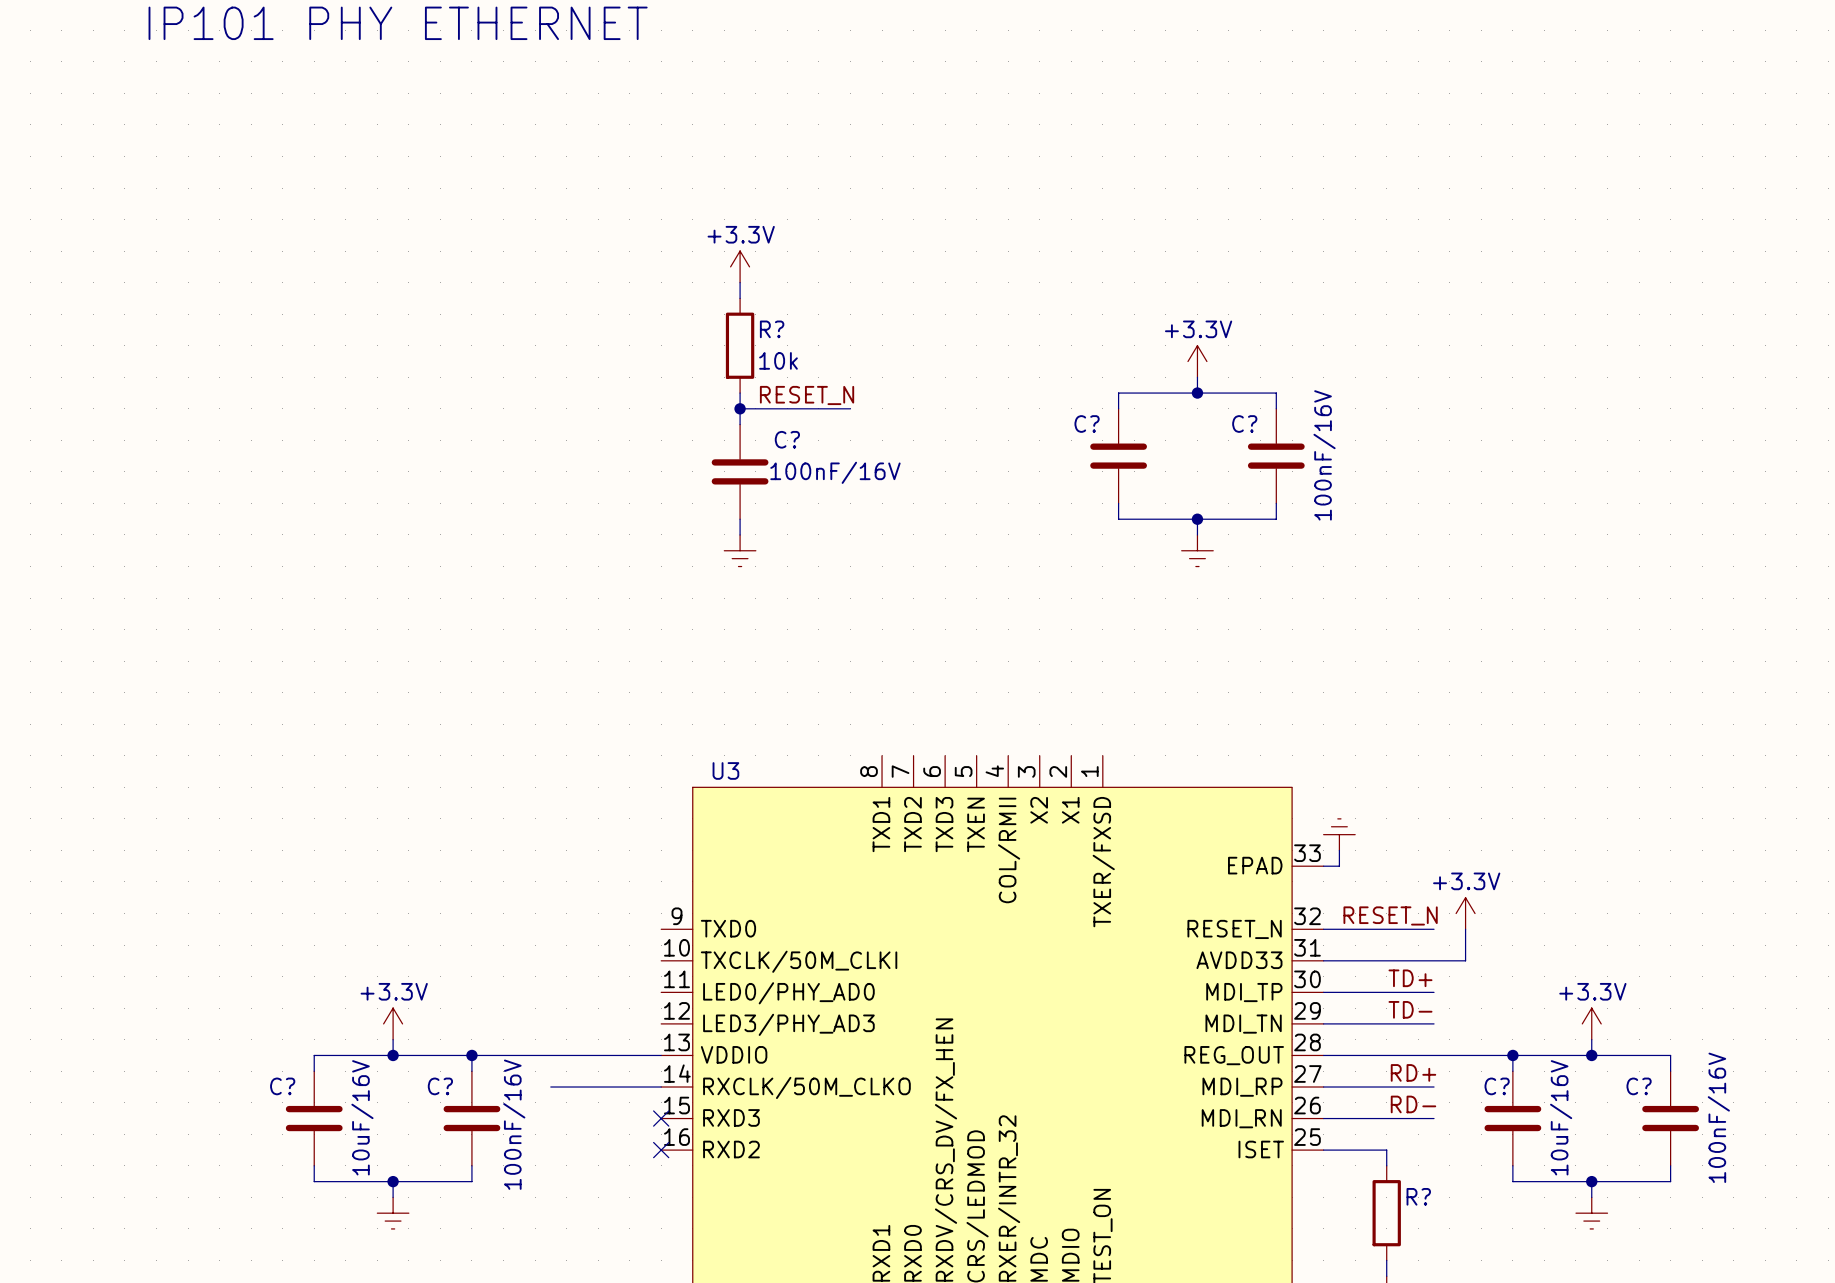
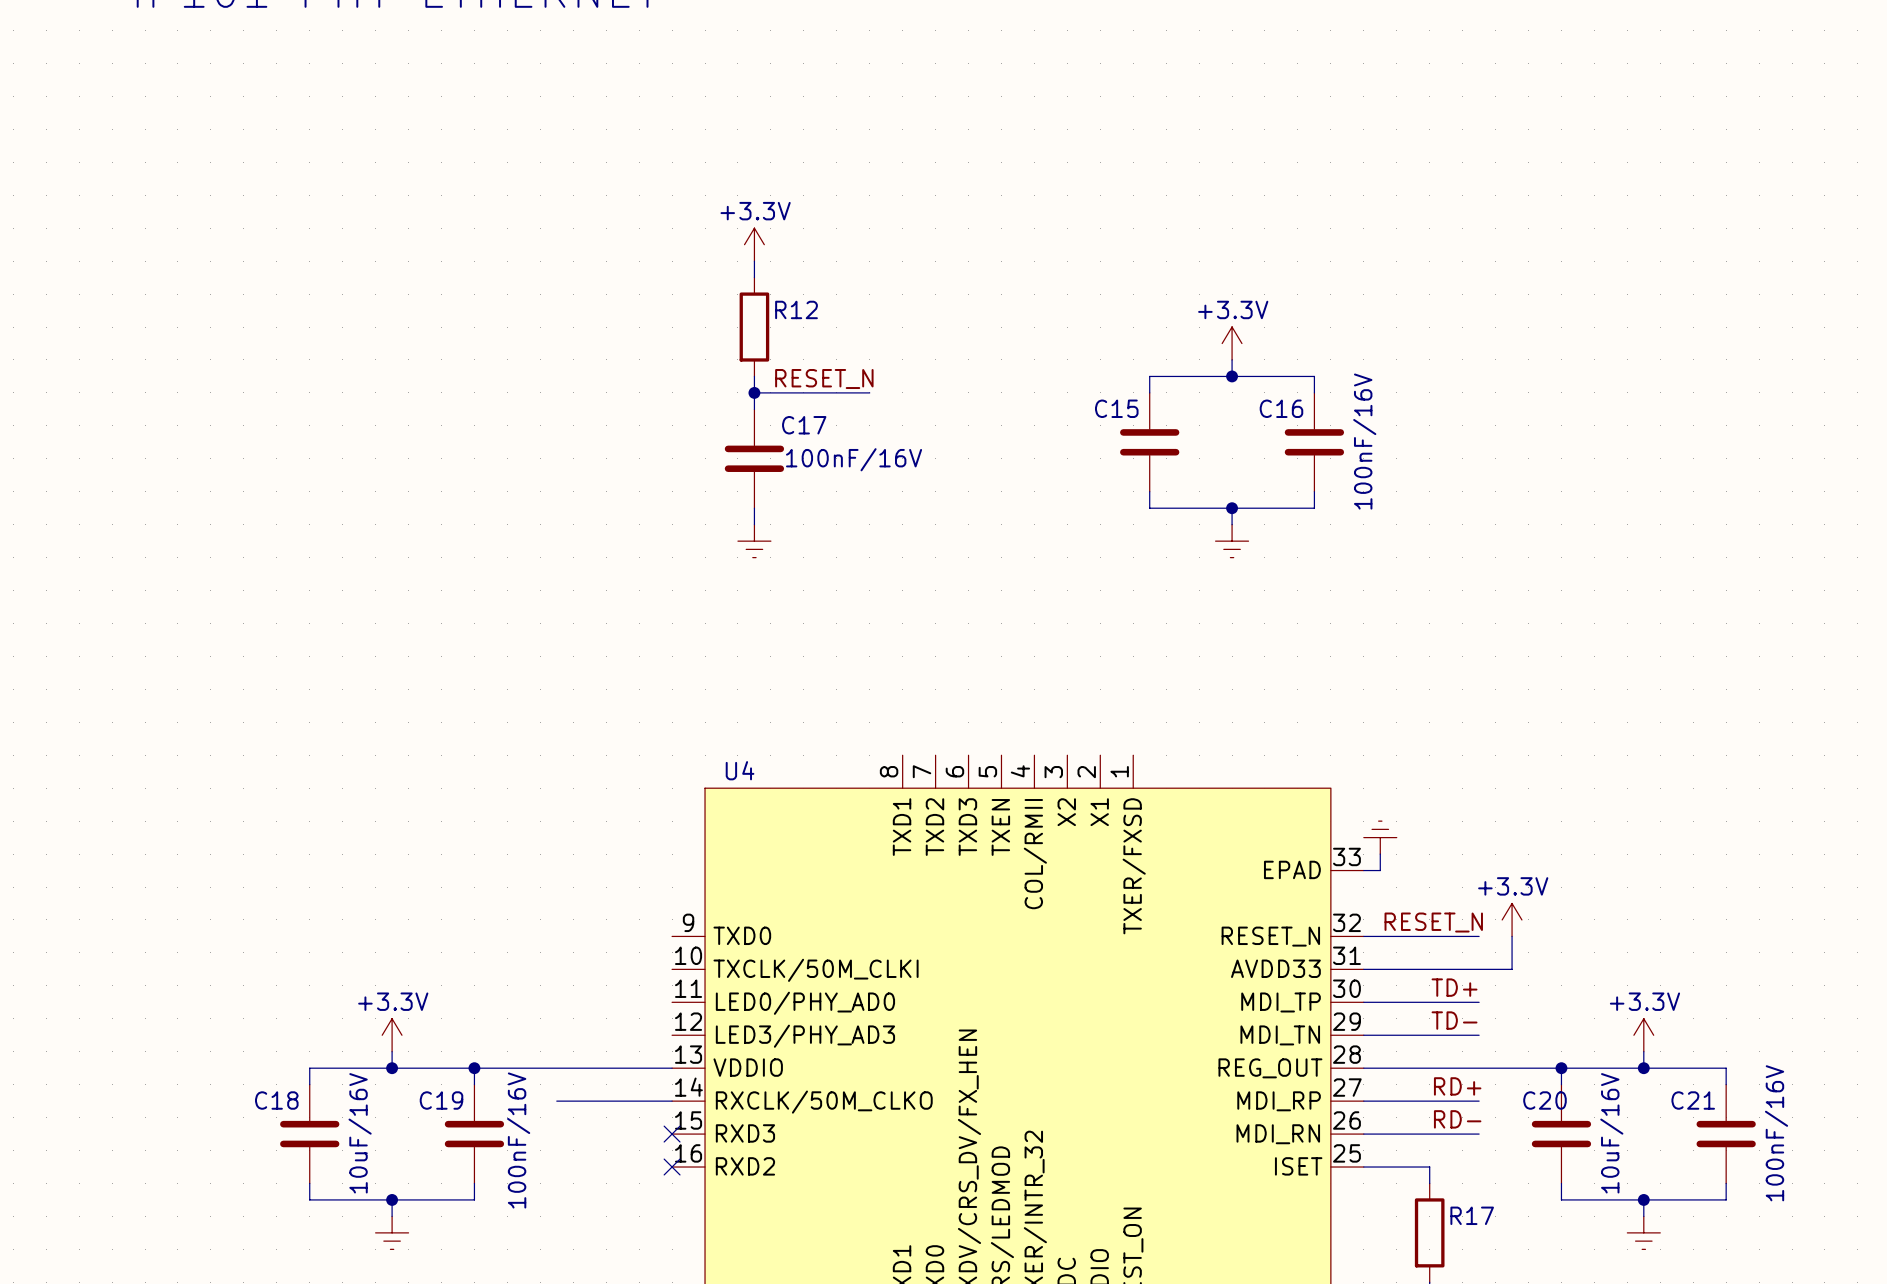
R? name: R? (772, 329) -> R12 (796, 309)
R? value: 10k (778, 360) -> none
C? name: C? (1087, 423) -> C15 (1116, 408)
C? name: C? (1244, 423) -> C16 (1281, 408)
C? name: C? (787, 439) -> C17 (804, 425)
U3 name: U3 (725, 770) -> U4 (740, 770)
C? name: C? (282, 1086) -> C18 (276, 1100)
C? name: C? (440, 1086) -> C19 (441, 1100)
C? name: C? (1497, 1086) -> C20 (1544, 1100)
C? name: C? (1639, 1086) -> C21 (1693, 1100)
R? name: R? (1418, 1196) -> R17 (1472, 1215)

